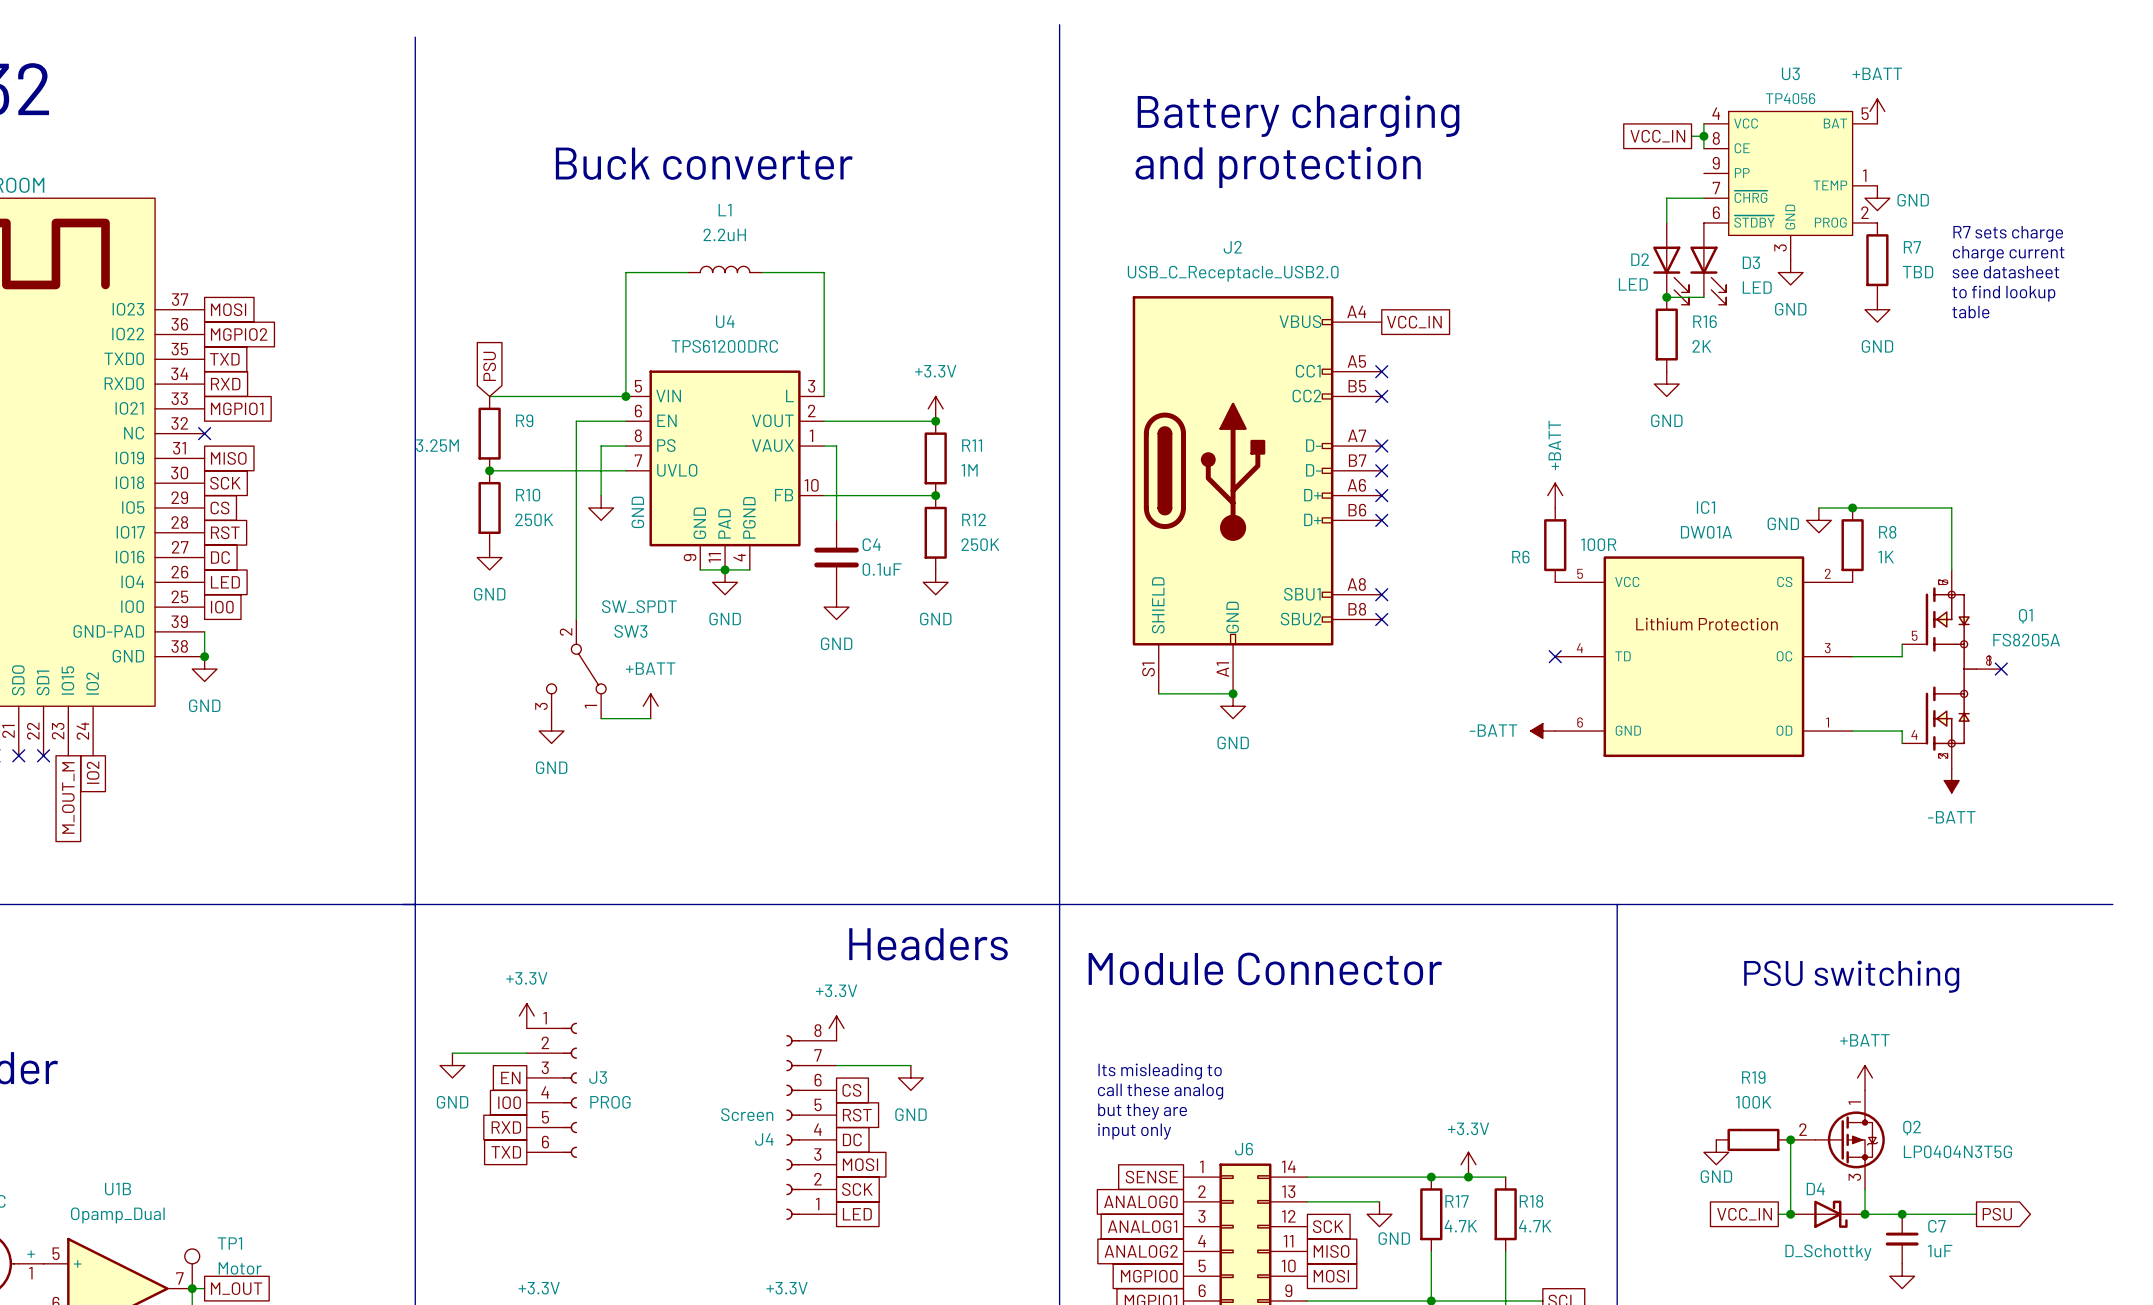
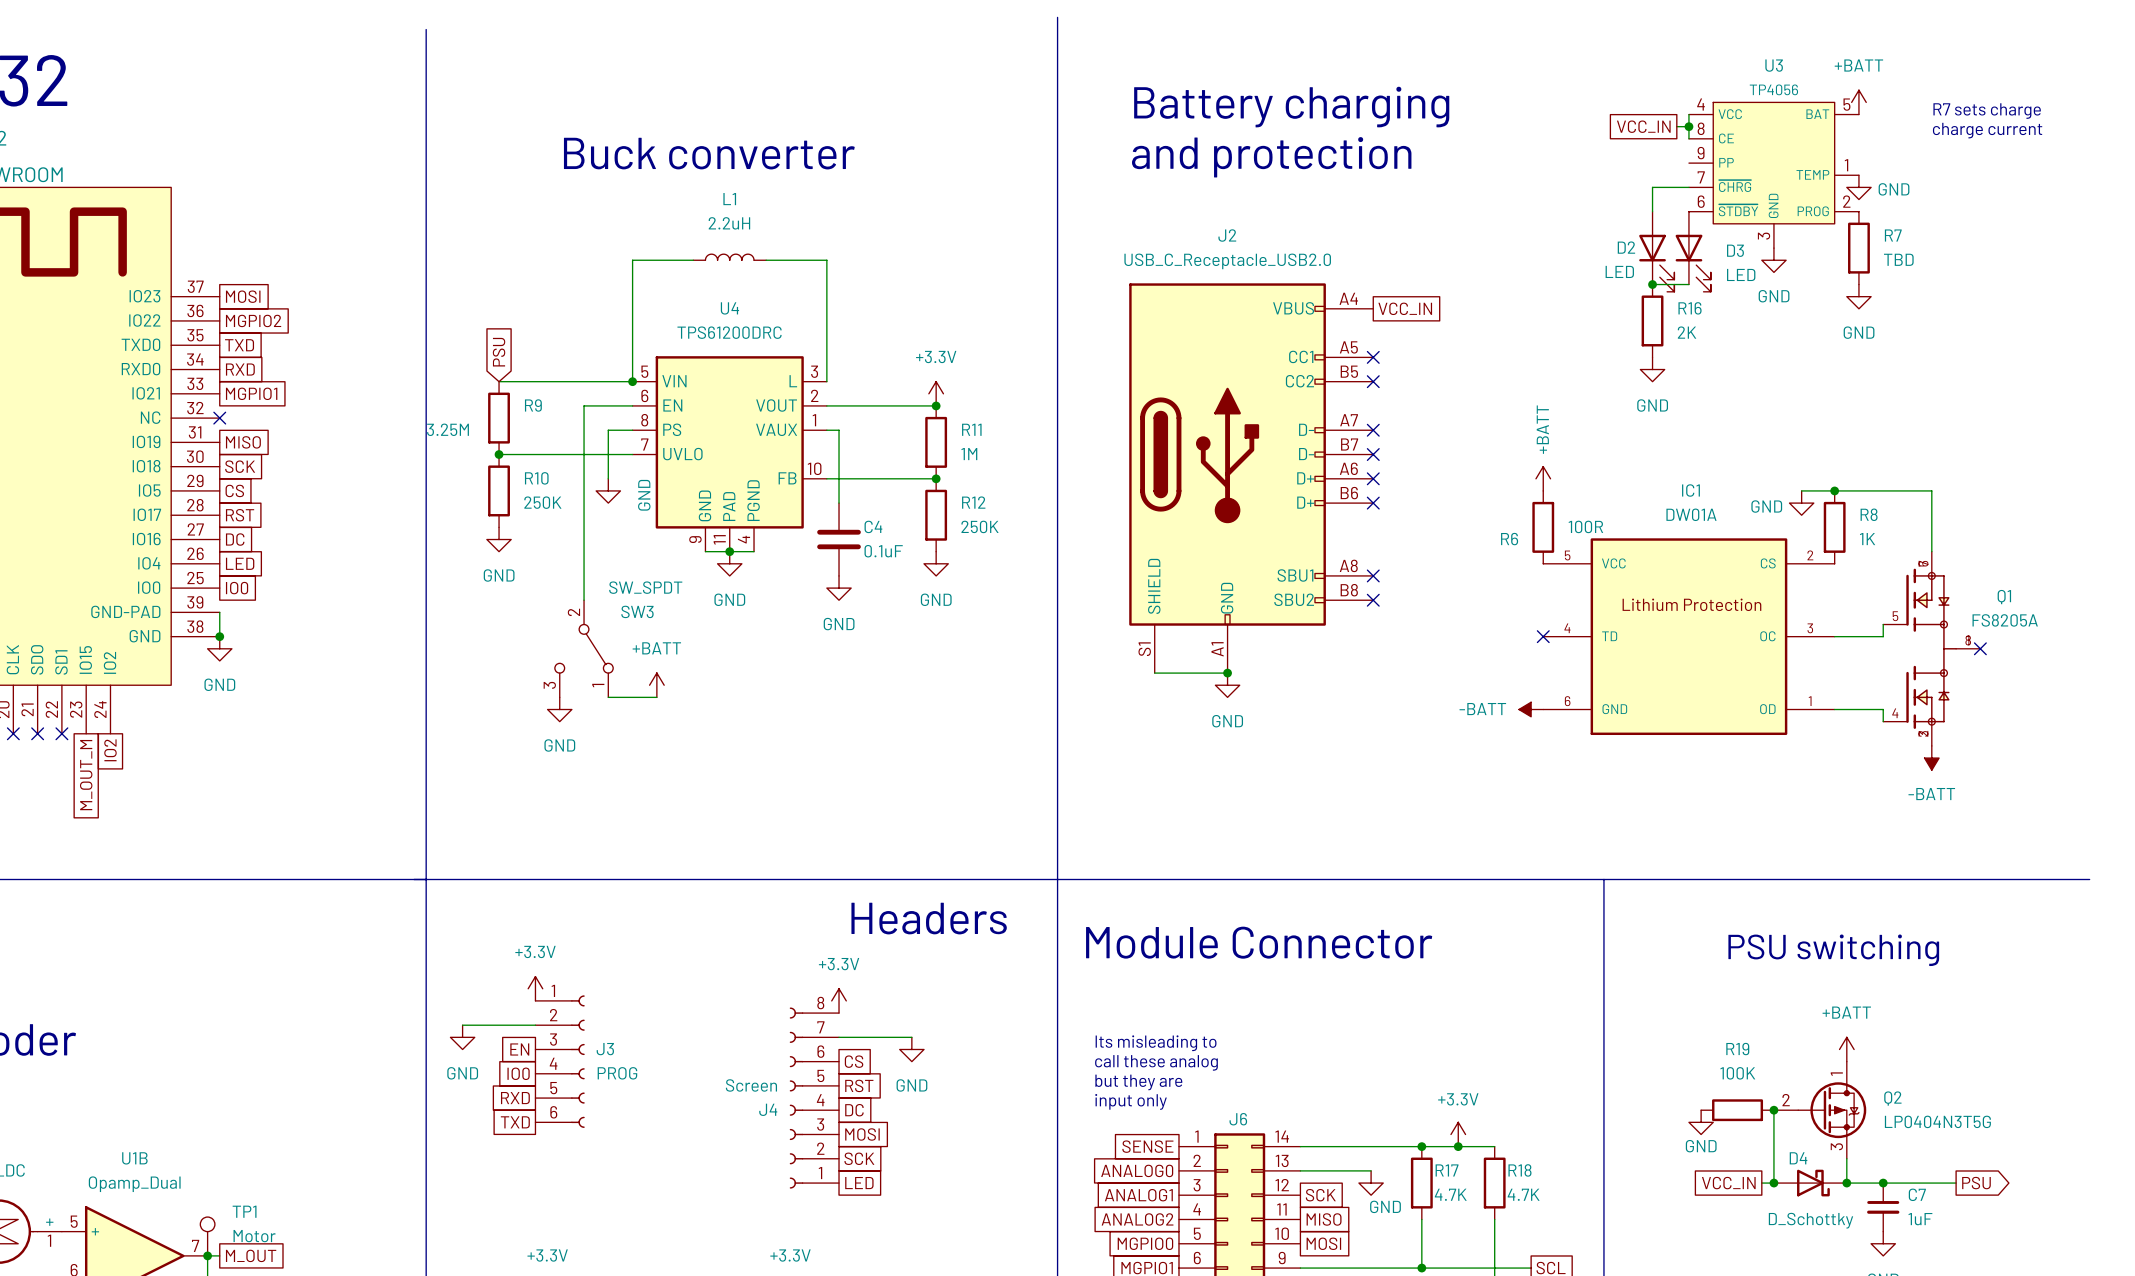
text position: R7 sets charge (2008, 233) -> R7 sets charge (1987, 111)
text position: charge current (2008, 253) -> charge current (1987, 130)
text: see datasheet (2005, 272) -> none
text: to find lookup (2003, 293) -> none
text: table (1970, 312) -> none

